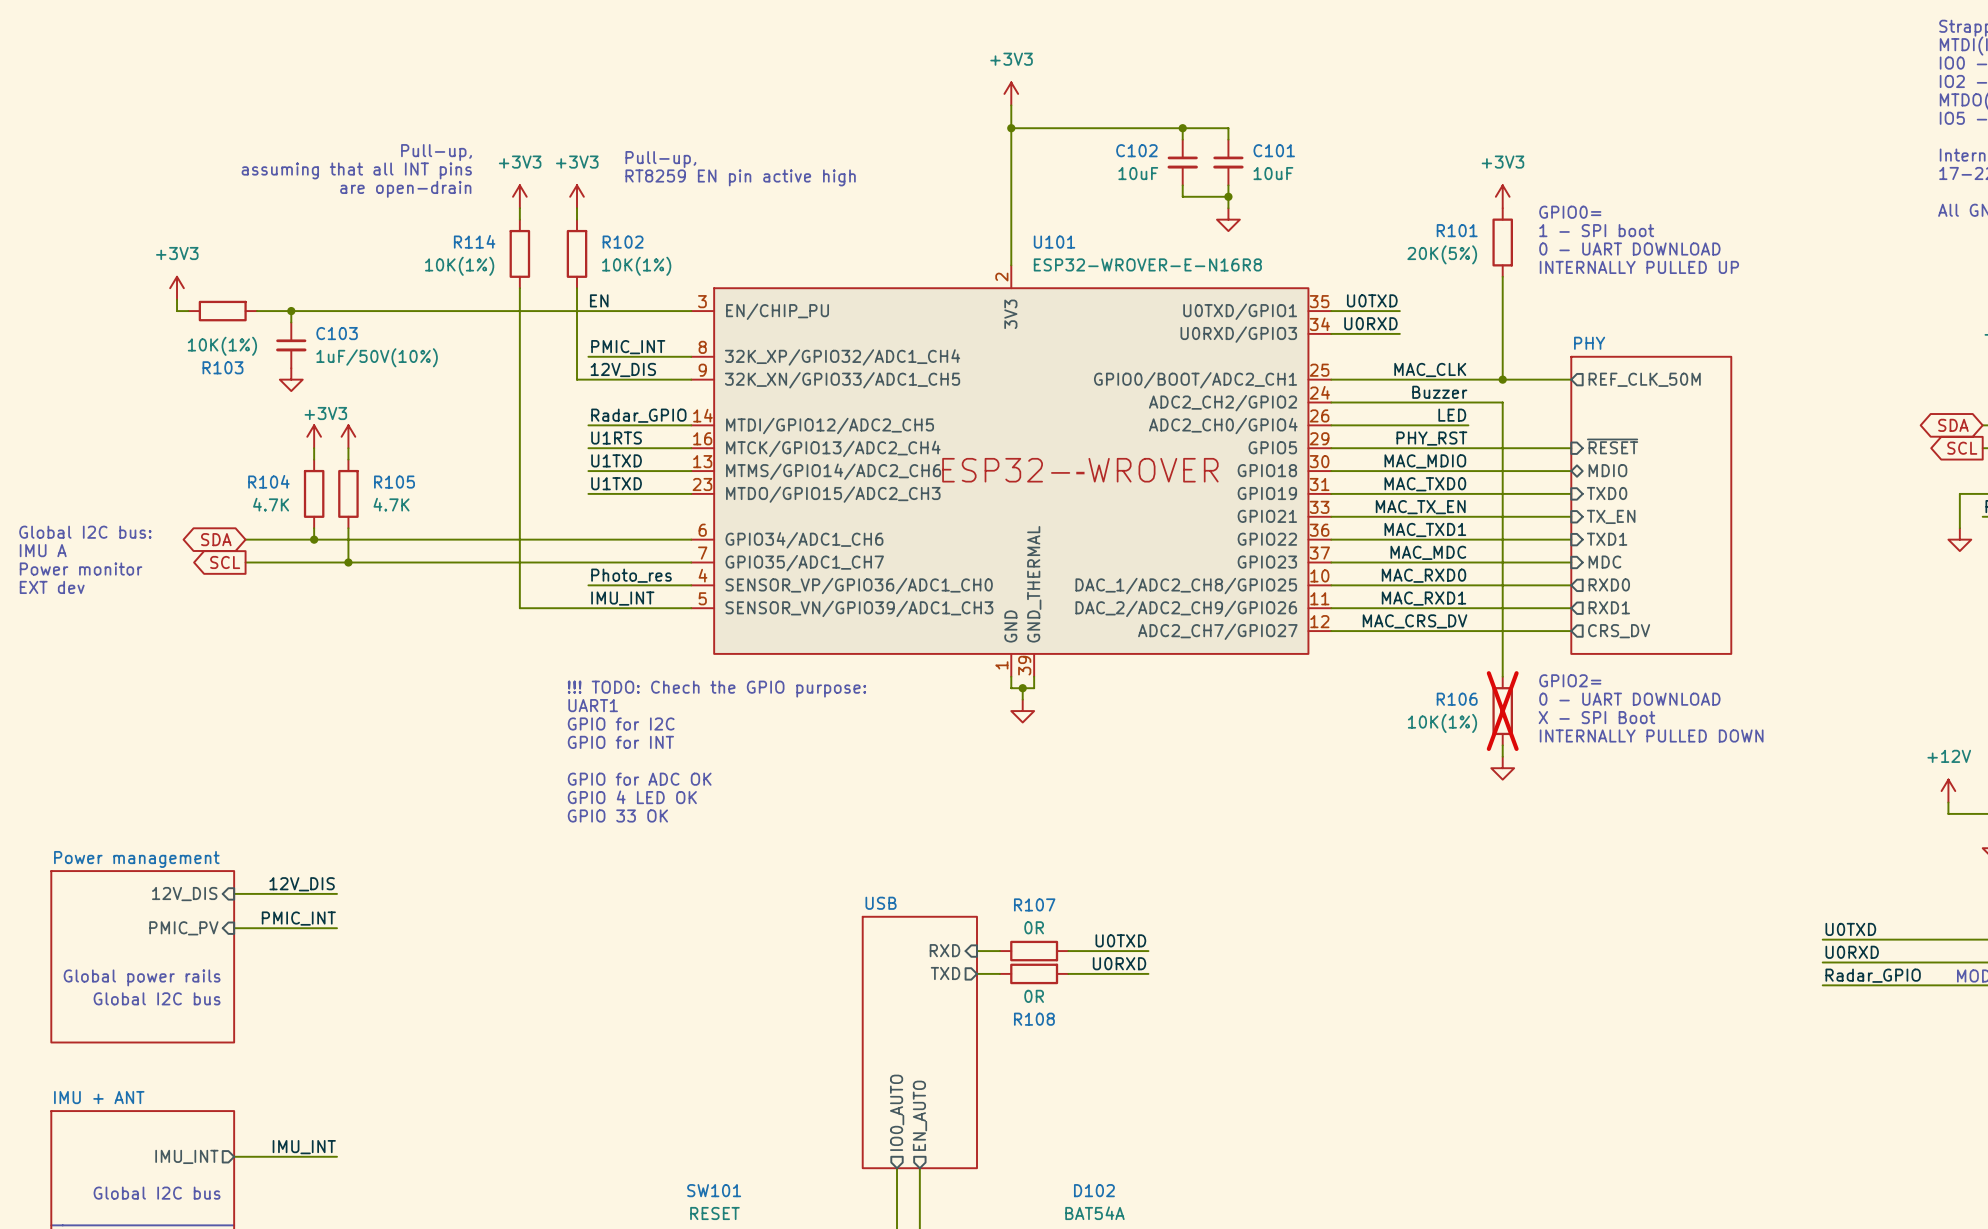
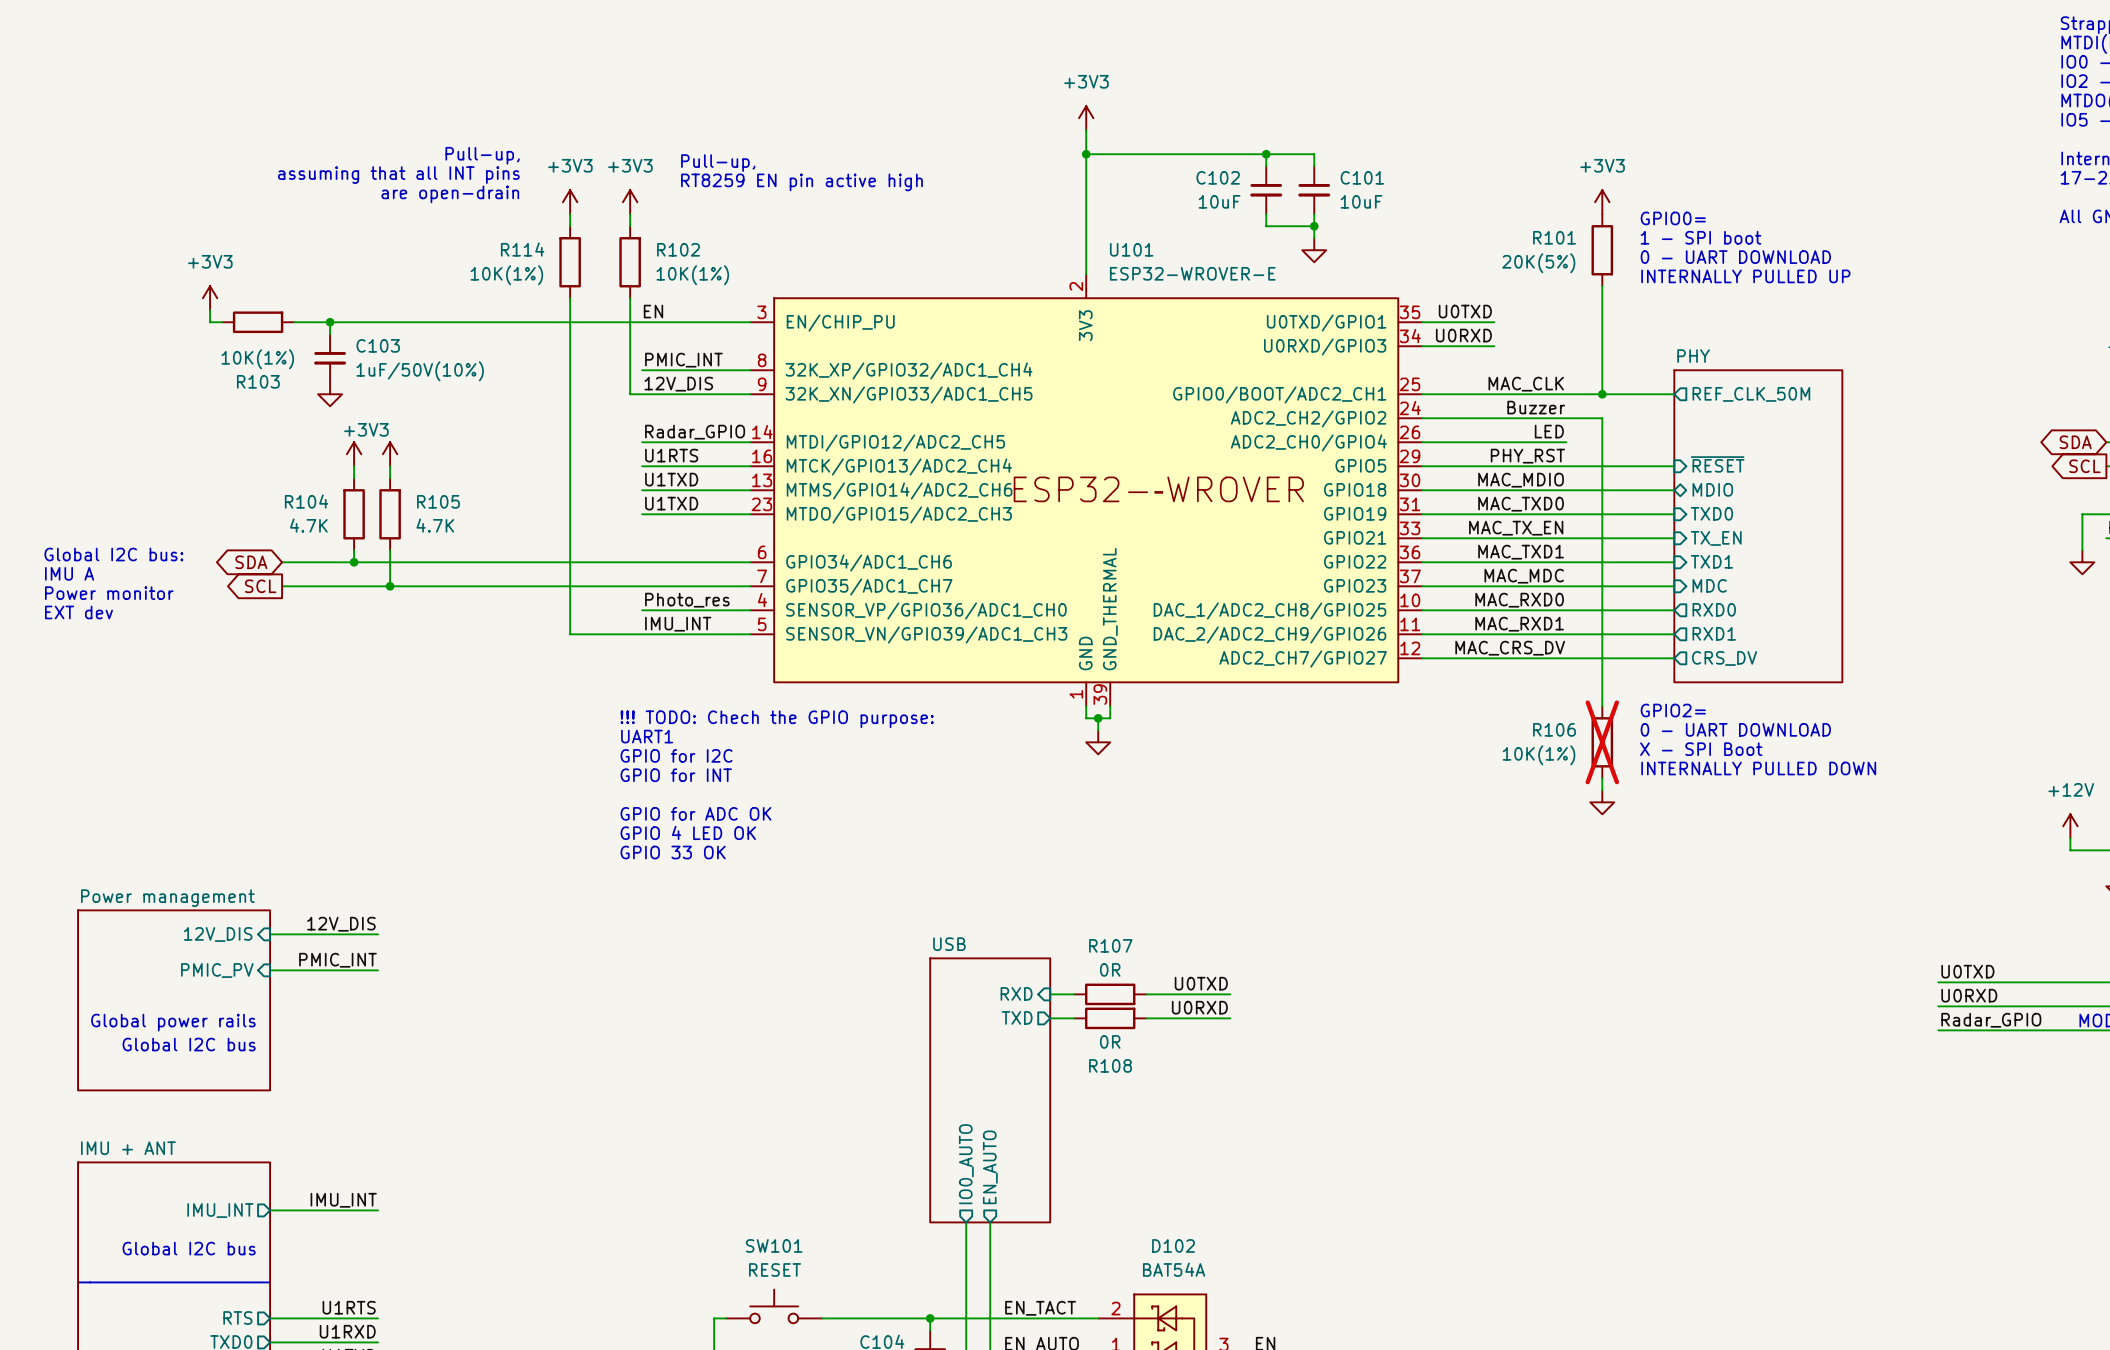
power symbol position: +3V3 (1011, 93) -> +3V3 (1086, 118)
wire: (1011, 105) (1011, 128) (1228, 128) (1228, 139) -> none
junction position: (1011, 128) -> (1086, 154)
junction position: (1182, 128) -> (1266, 154)
wire: none -> (1086, 154) (1314, 154) (1314, 166)
C102 position: (1182, 162) -> (1266, 190)
C101 position: (1228, 162) -> (1314, 190)
wire: (1182, 185) (1182, 196) (1228, 196) -> (1266, 214) (1266, 226) (1314, 226)
junction position: (1228, 196) -> (1314, 226)
power symbol position: (1228, 219) -> (1314, 250)
U101 value: ESP32-WROVER-E-N16R8 (1147, 264) -> ESP32-WROVER-E (1192, 273)

